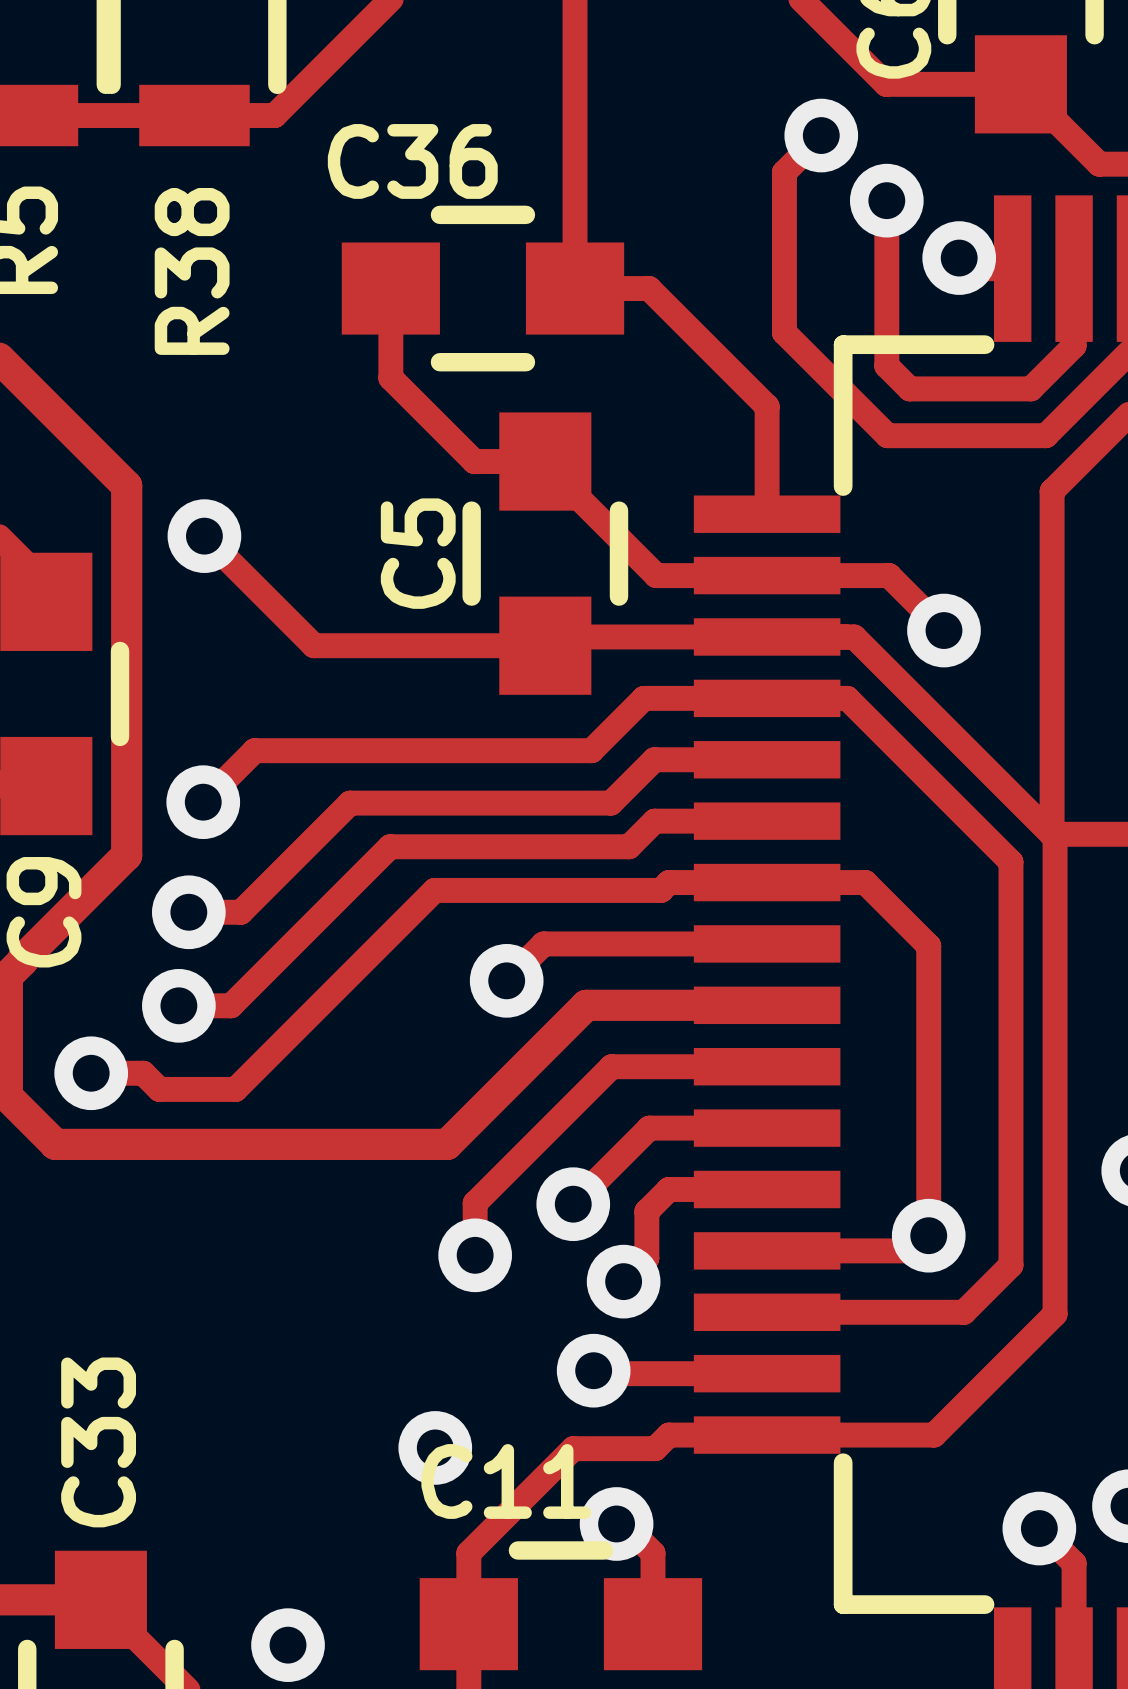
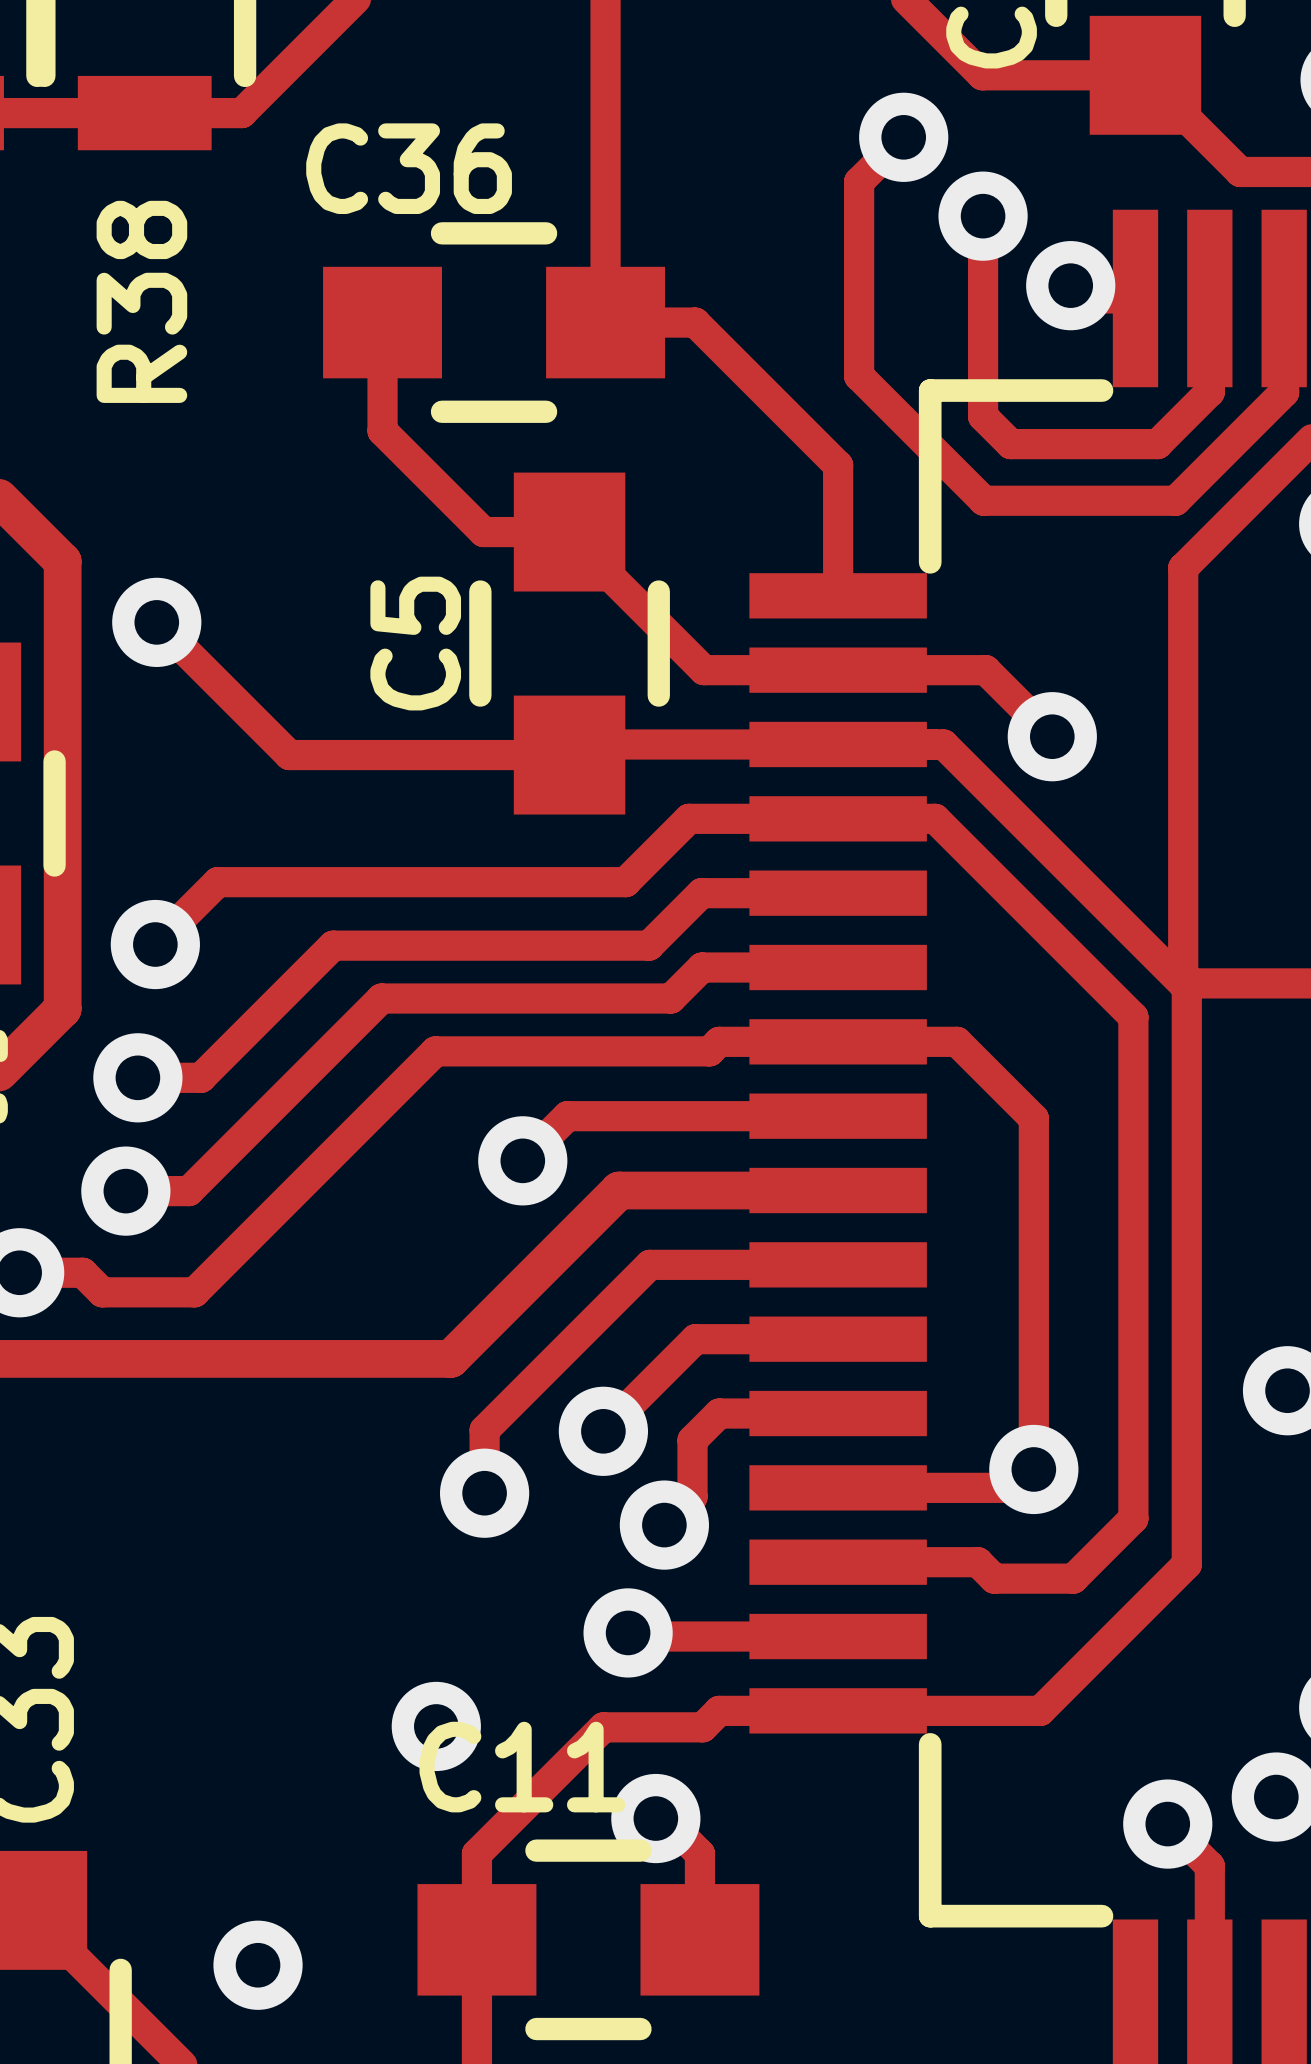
track: (1010, 1265) (963, 1312) (882, 1312) -> (1133, 1505) (1133, 1518) (1073, 1578) (994, 1578) (977, 1562)

